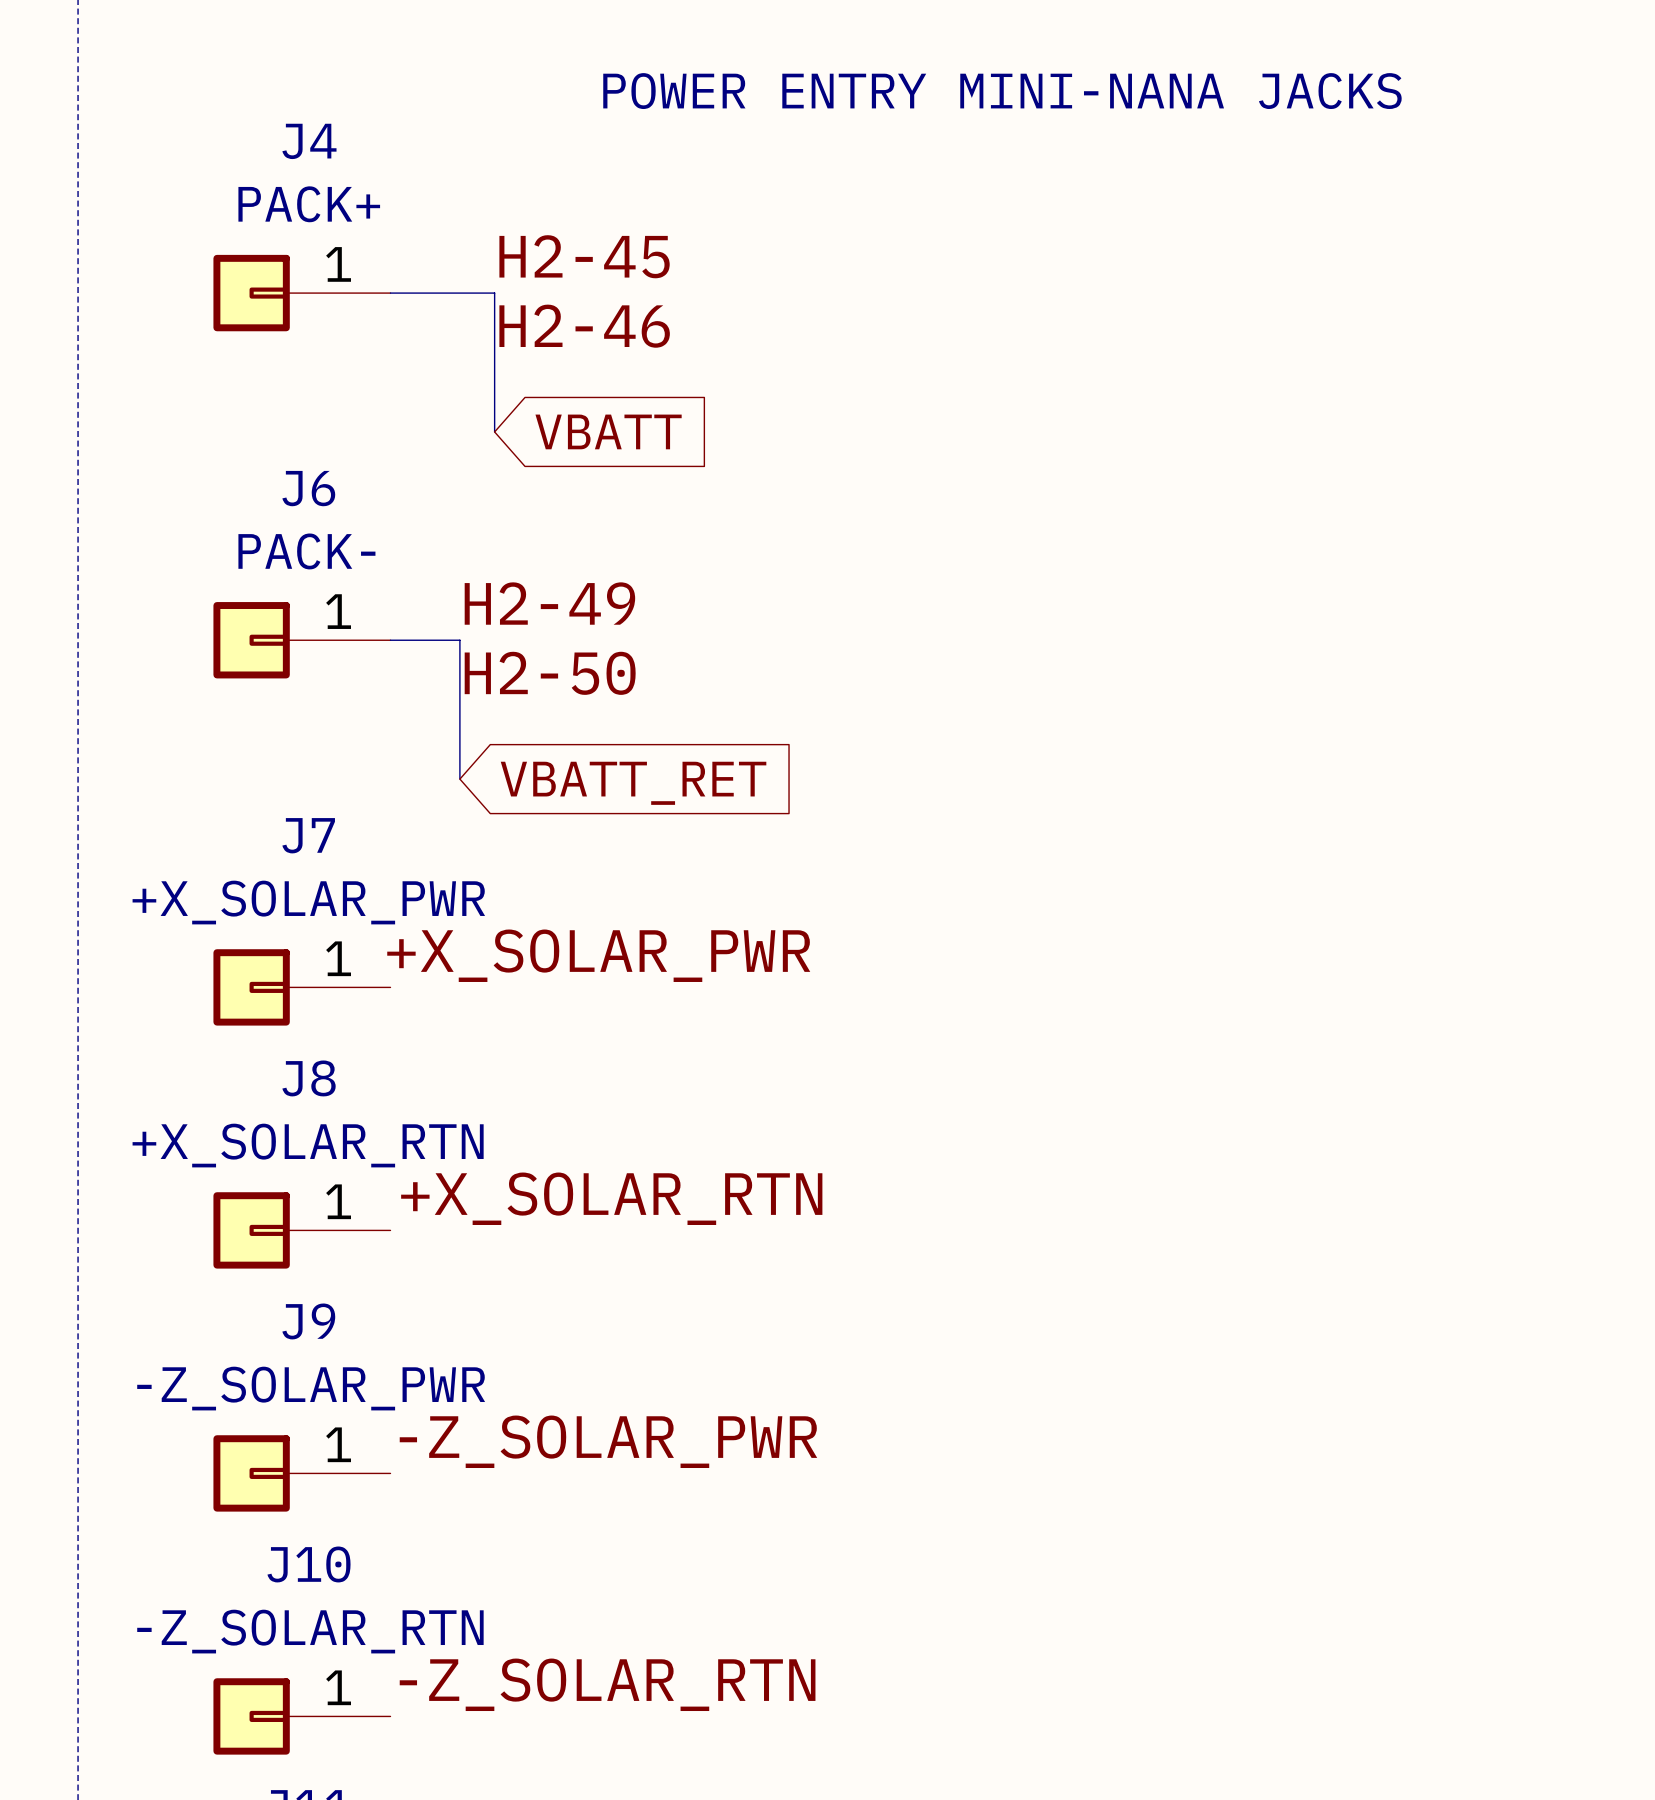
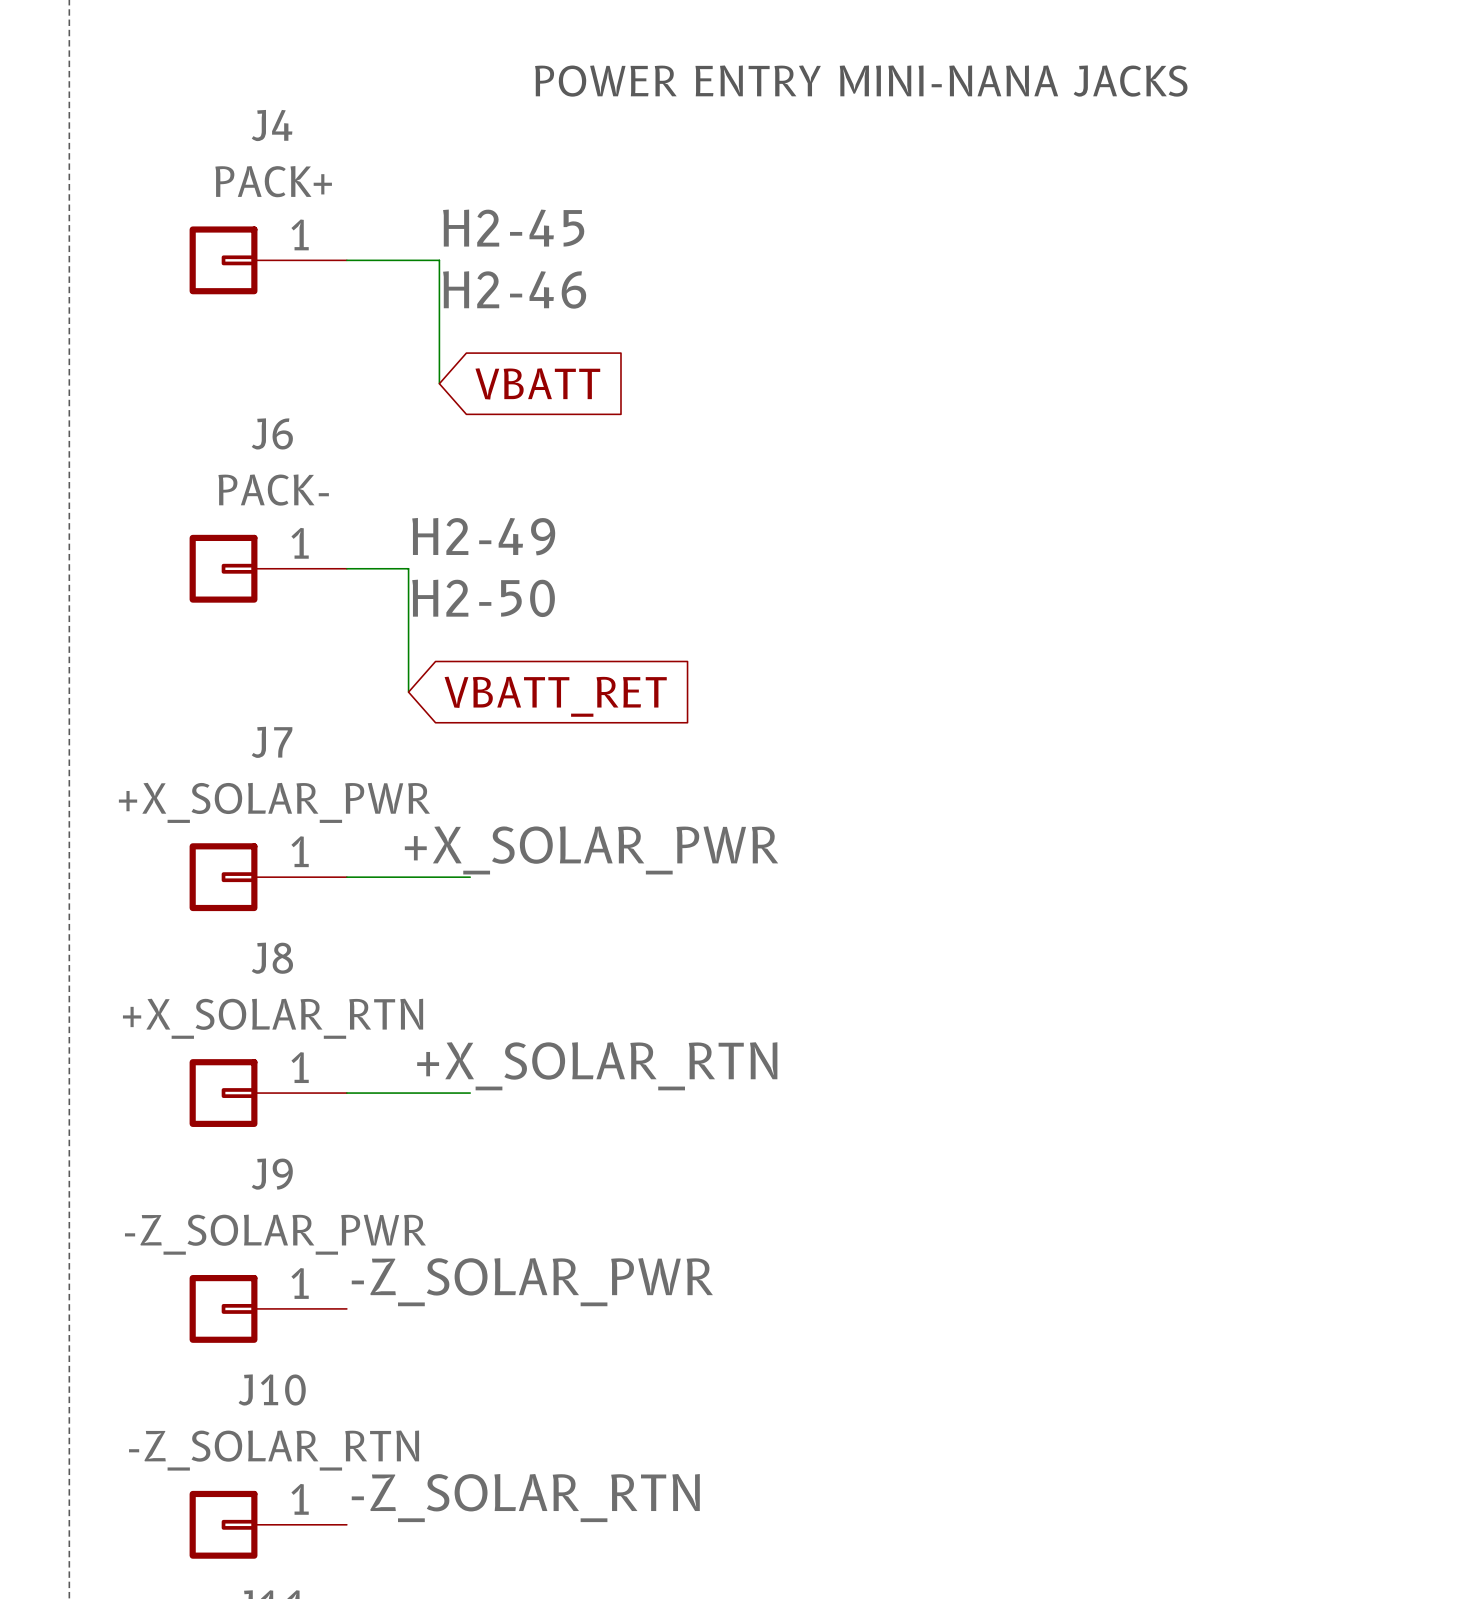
label position: +X_SOLAR_PWR (598, 955) -> +X_SOLAR_PWR (591, 850)
wire: none -> (346, 877) (470, 877)
label position: +X_SOLAR_RTN (611, 1198) -> +X_SOLAR_RTN (597, 1066)
wire: none -> (346, 1093) (470, 1093)

